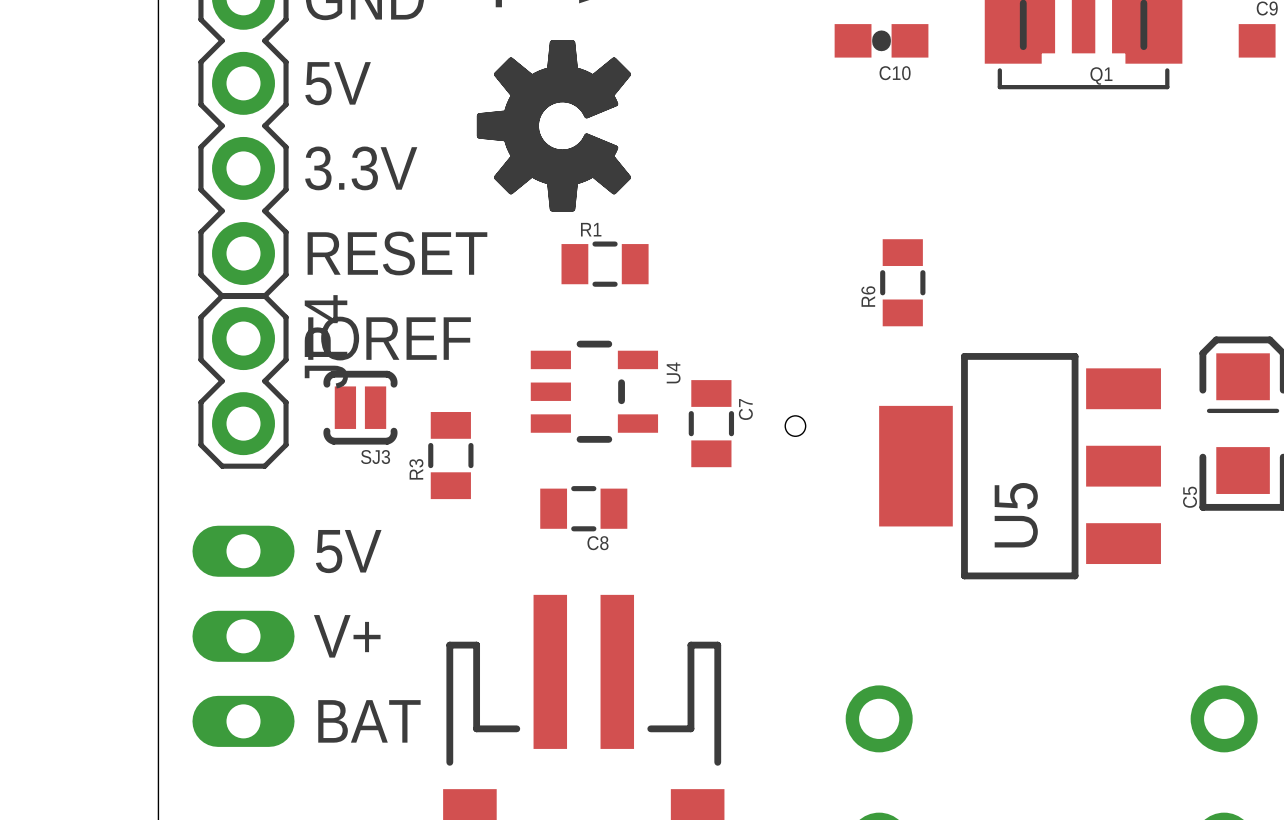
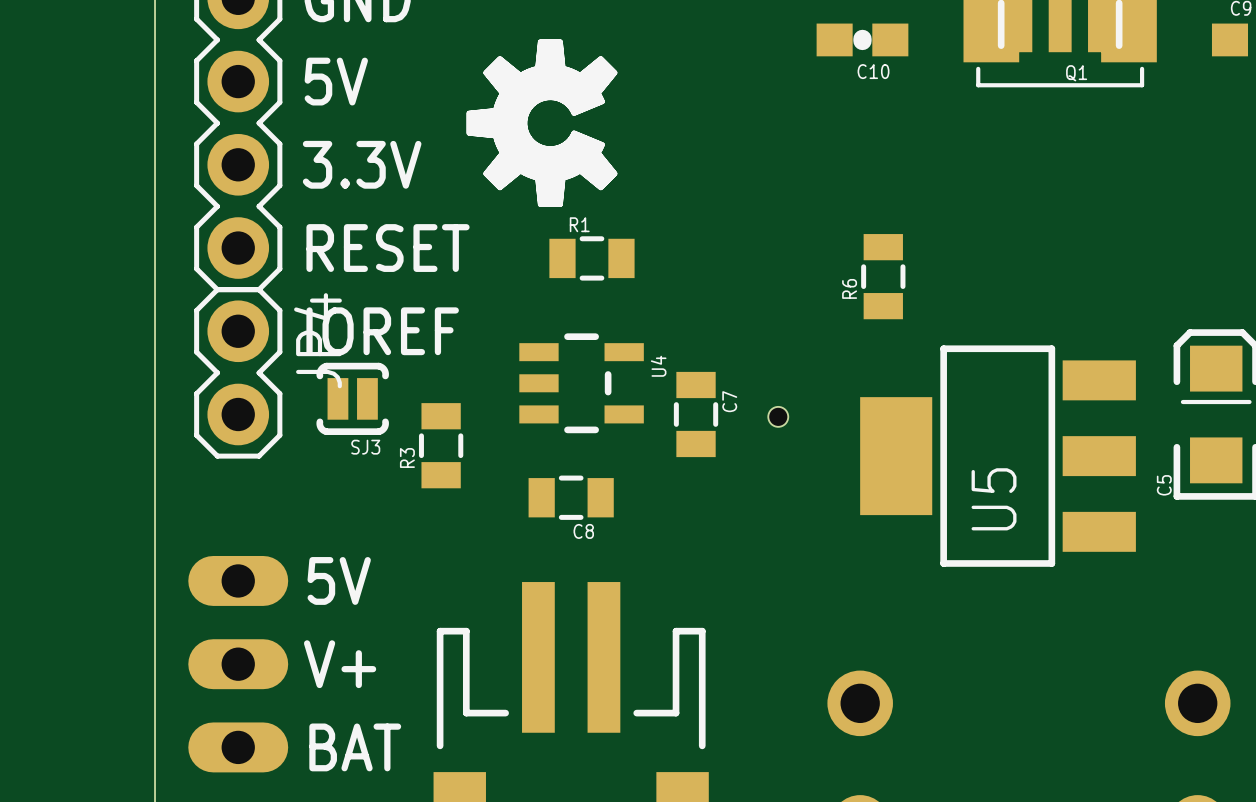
text position: 5V (348, 551) -> 5V (339, 580)
part position: (243, 636) -> (238, 664)
text position: V+ (347, 636) -> V+ (340, 664)
text position: BAT (369, 721) -> BAT (355, 747)

